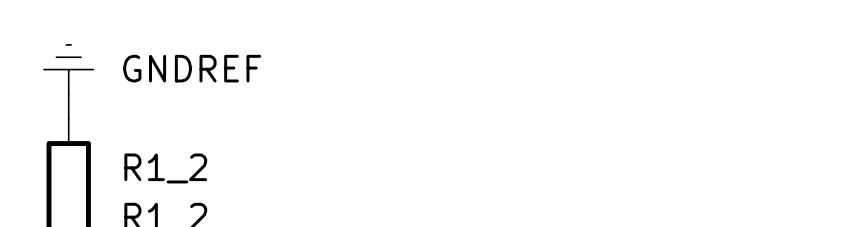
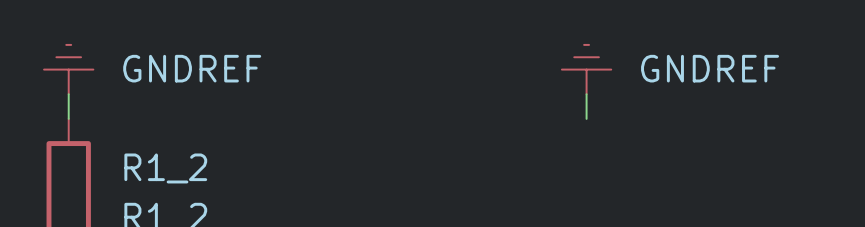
power symbol: none -> GNDREF (586, 69)
wire: none -> (586, 94) (586, 118)

